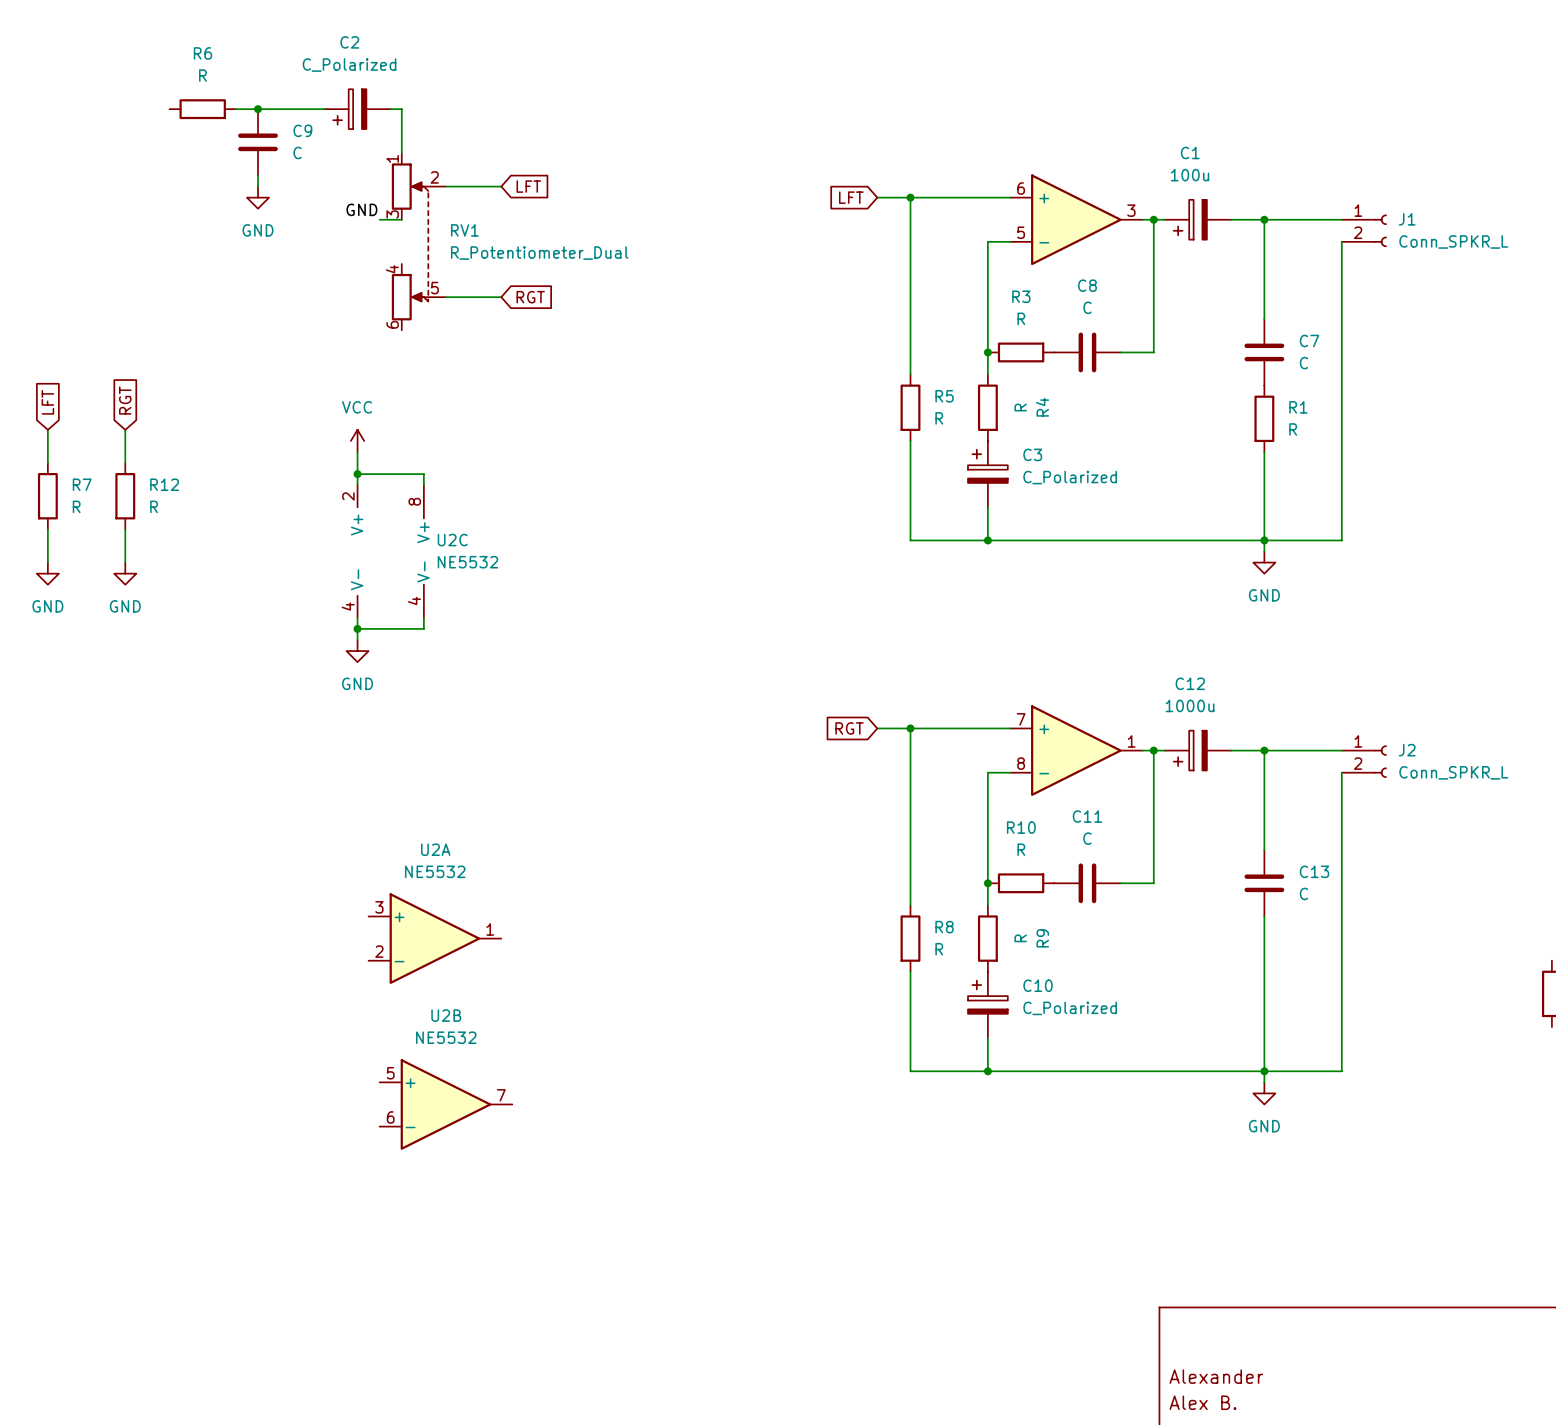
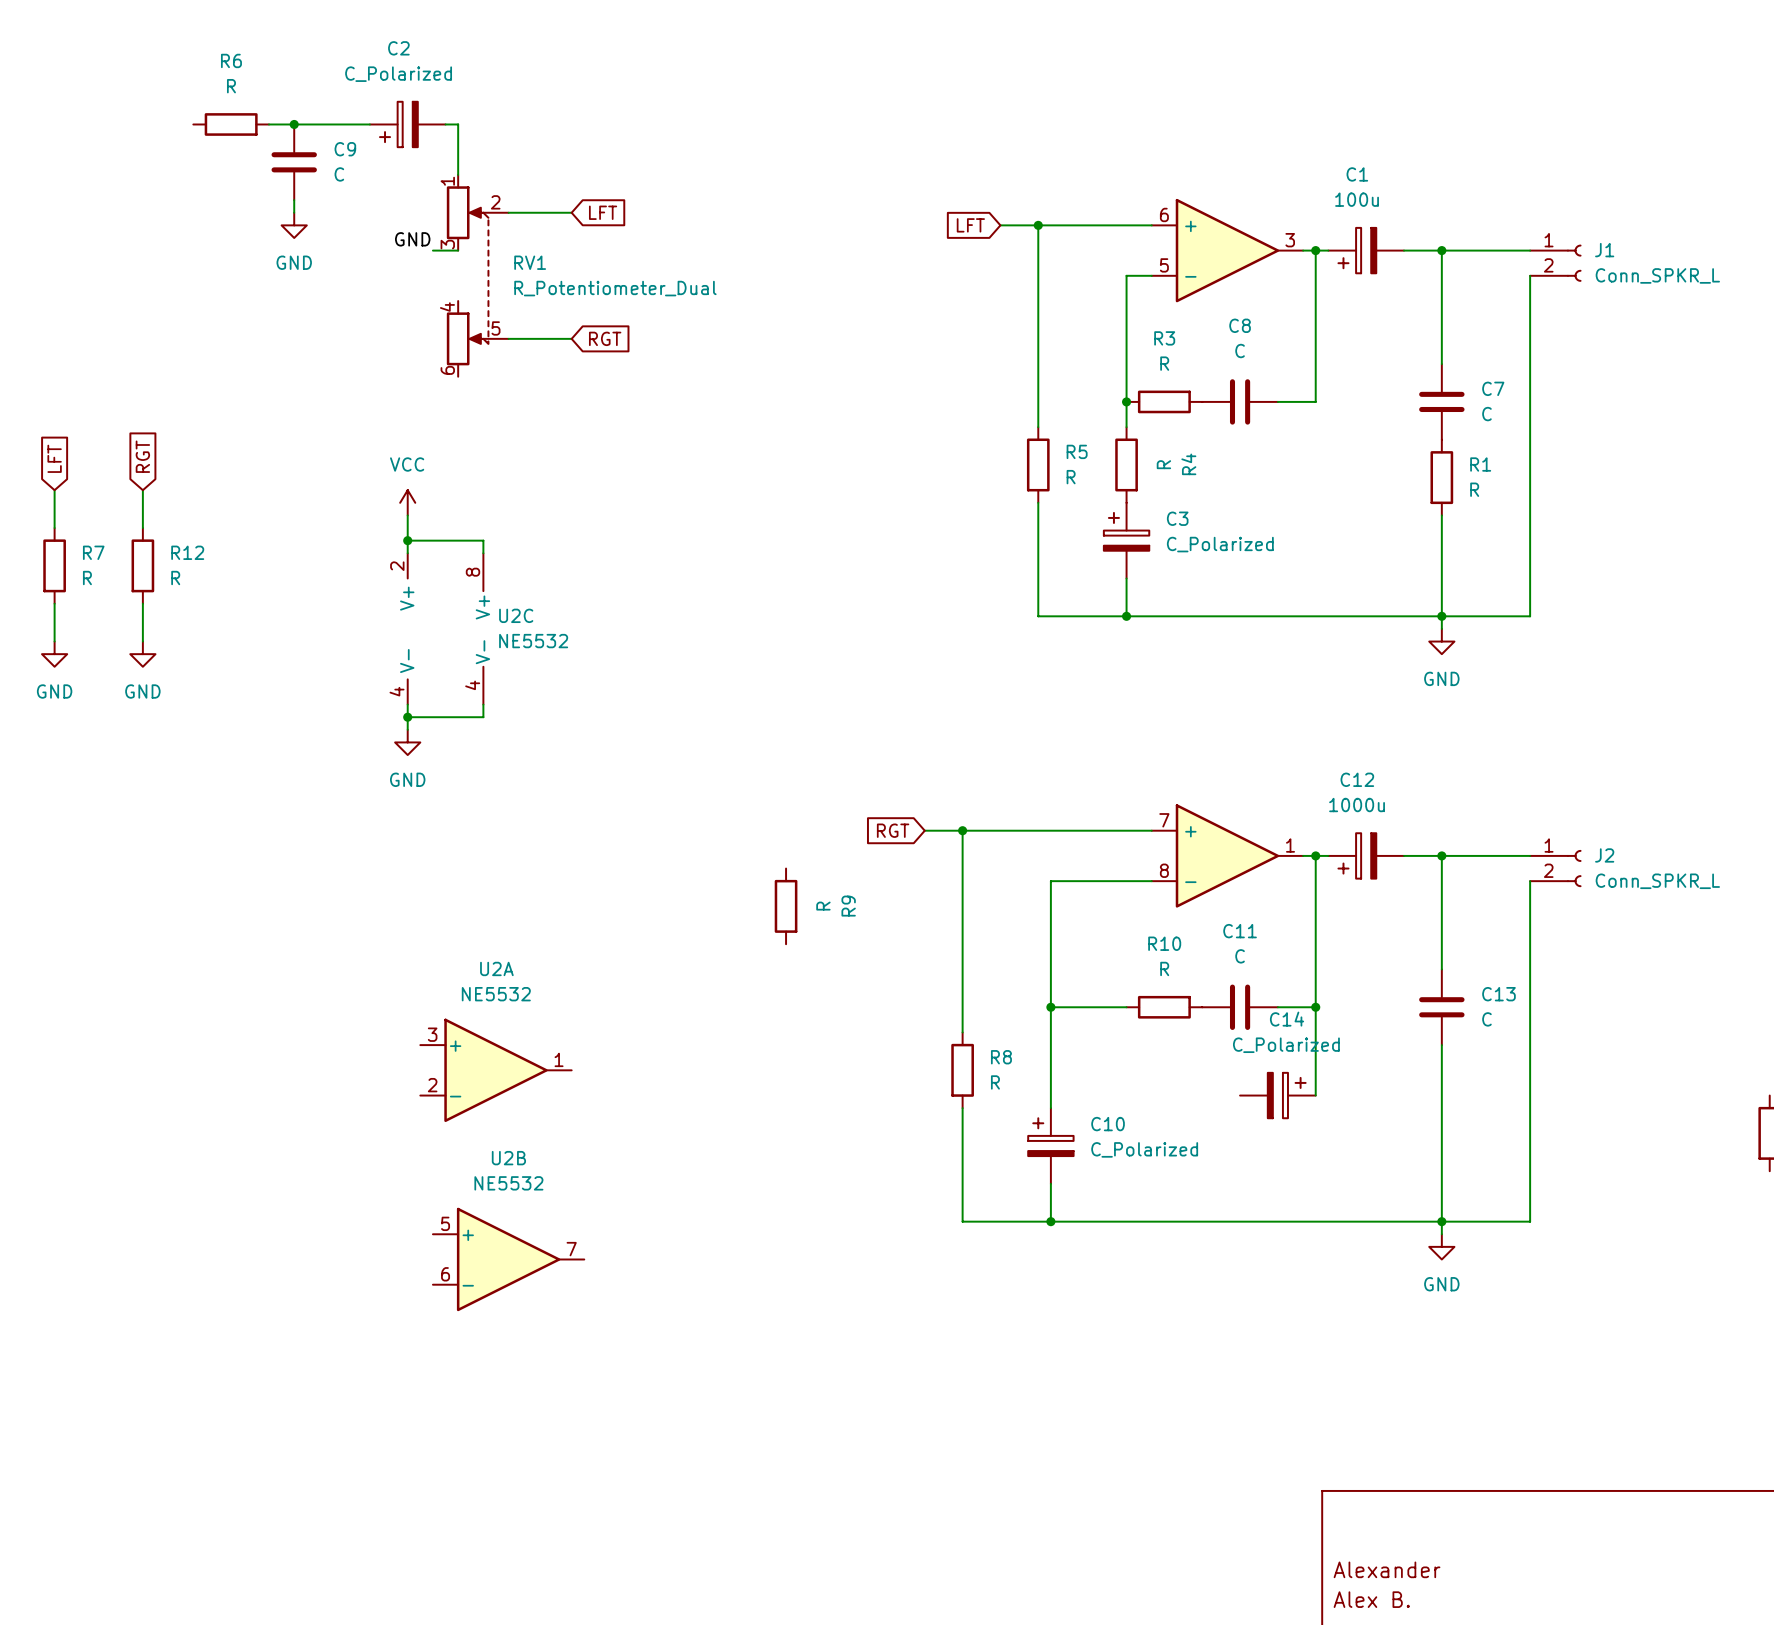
wire: none -> (924, 830) (1000, 830)
junction: none -> (962, 830)
global label position: RGT (849, 728) -> RGT (893, 830)
wire: (910, 728) (910, 905) -> (962, 830) (962, 1032)
junction: (910, 728) -> none
wire: (987, 772) (987, 905) -> (1126, 881) (1050, 881) (1050, 1108)
wire: none -> (1050, 1007) (1126, 1007)
junction: none -> (1050, 1007)
junction: (987, 883) -> none
wire: none -> (1315, 1007) (1315, 1095)
junction: none -> (1315, 1007)
R8 position: (910, 938) -> (962, 1070)
R9 position: (987, 938) -> (786, 906)
C14: none -> C_Polarized (1277, 1095)
wire: (910, 971) (910, 1071) -> (962, 1108) (962, 1221) (1038, 1221)
C10 position: (987, 1004) -> (1050, 1145)
wire: (987, 1038) (987, 1071) -> (1050, 1183) (1050, 1221)
junction: none -> (1050, 1221)
junction: (987, 1071) -> none

